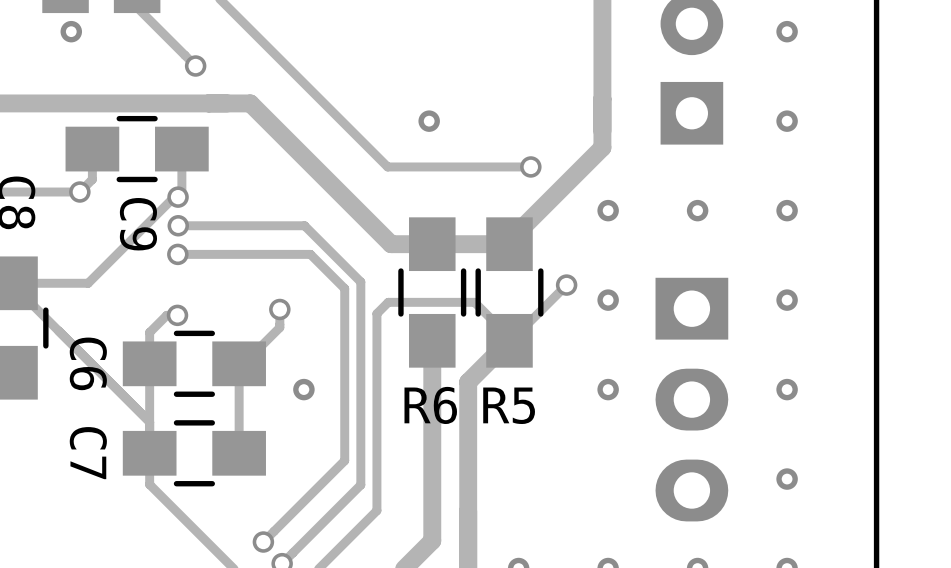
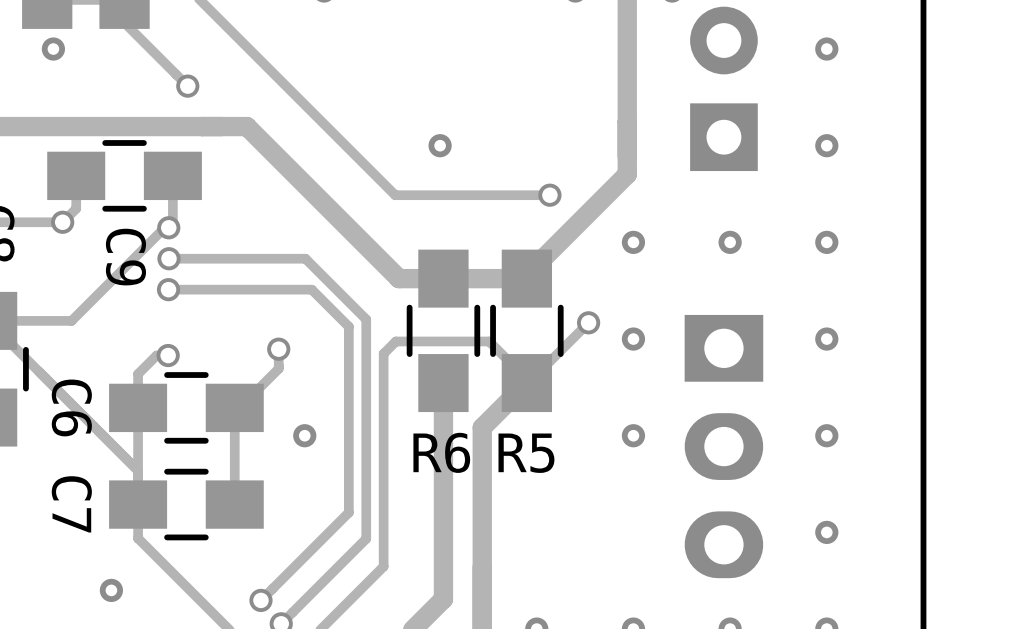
part: none -> (111, 590)

